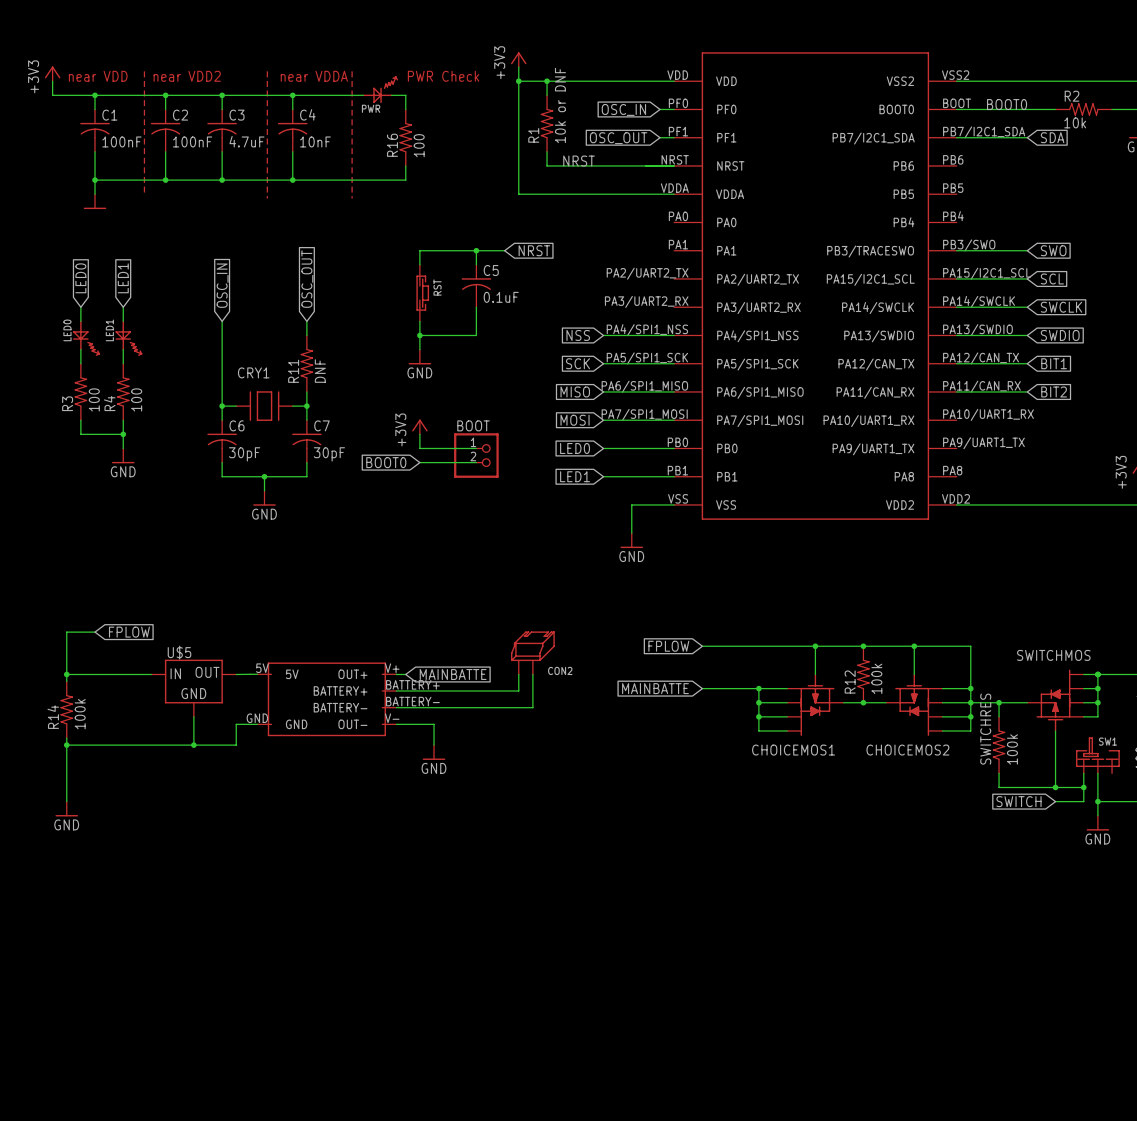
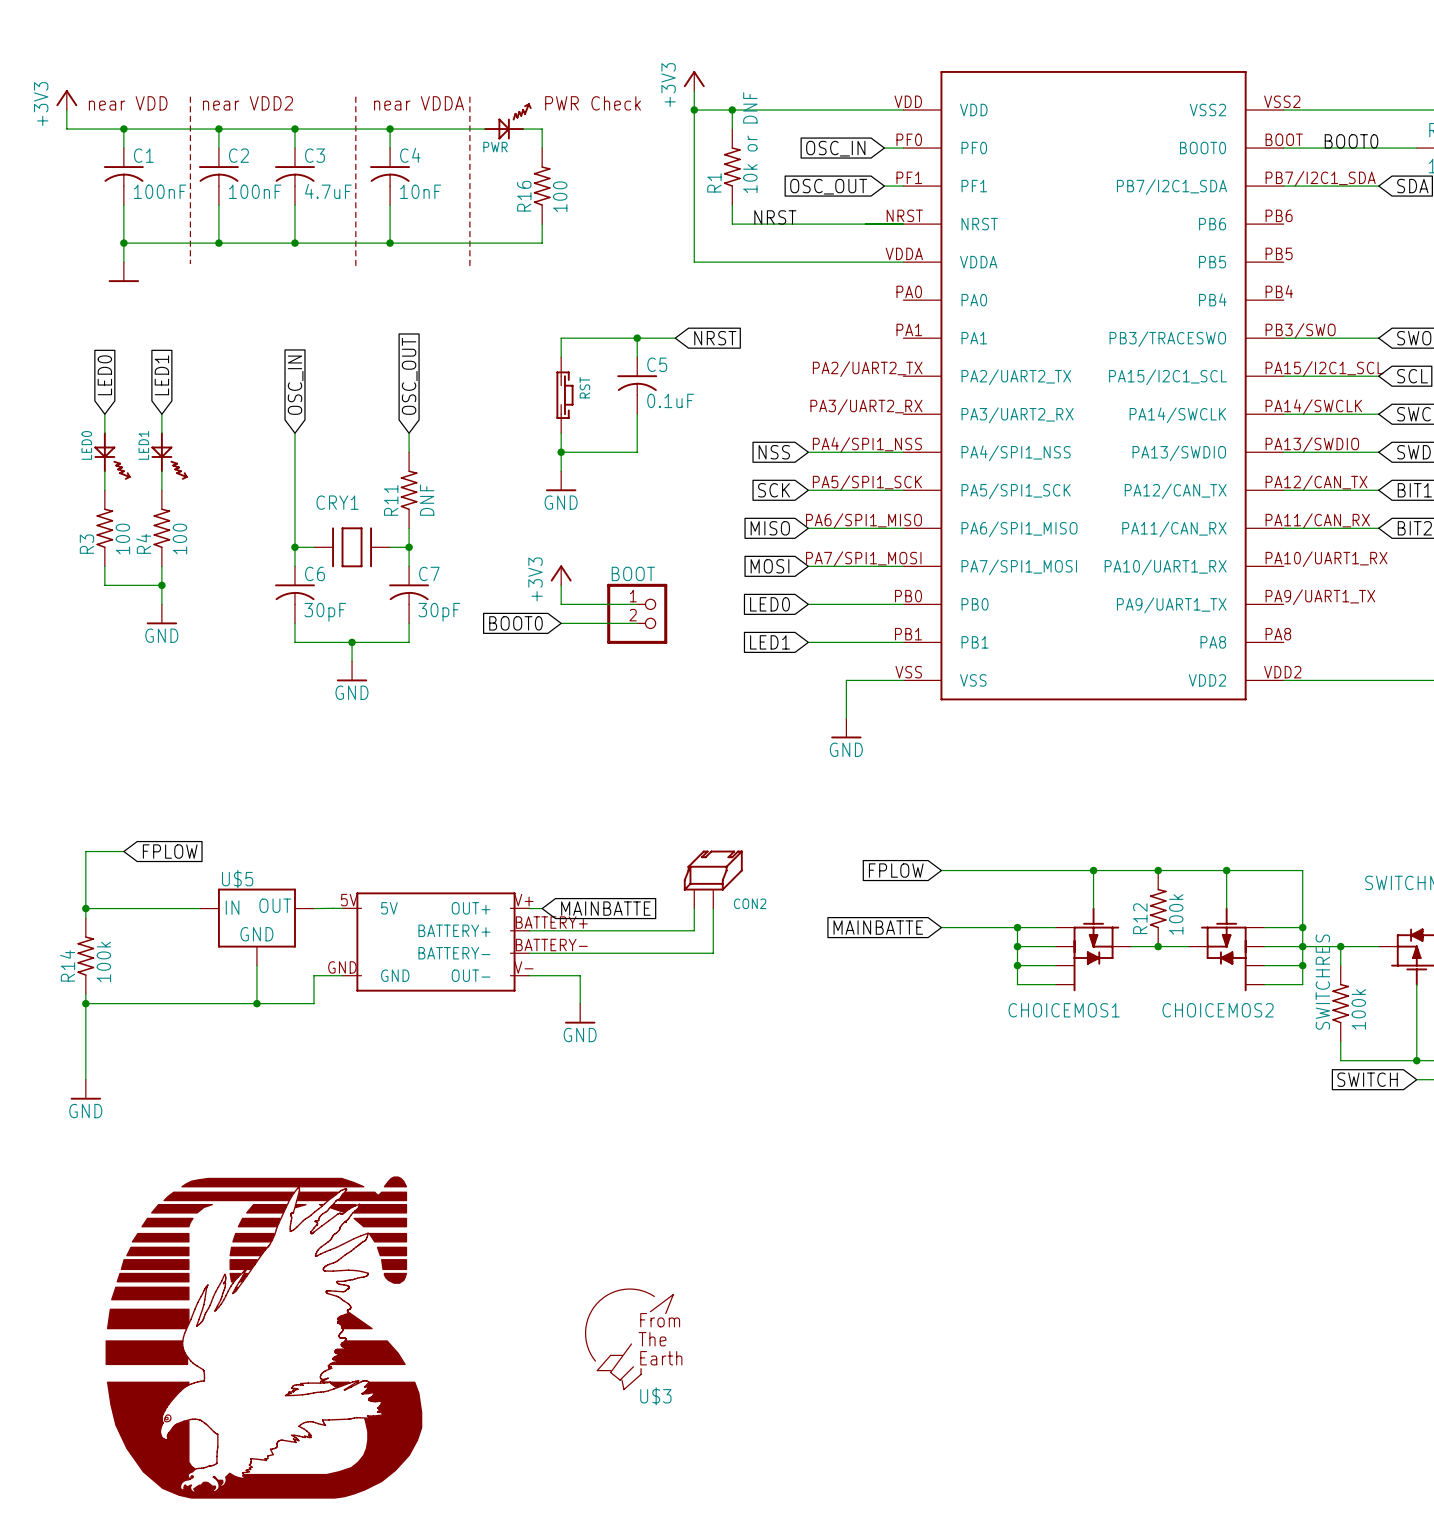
part: none -> (263, 1337)
U$3: none -> (629, 1339)

